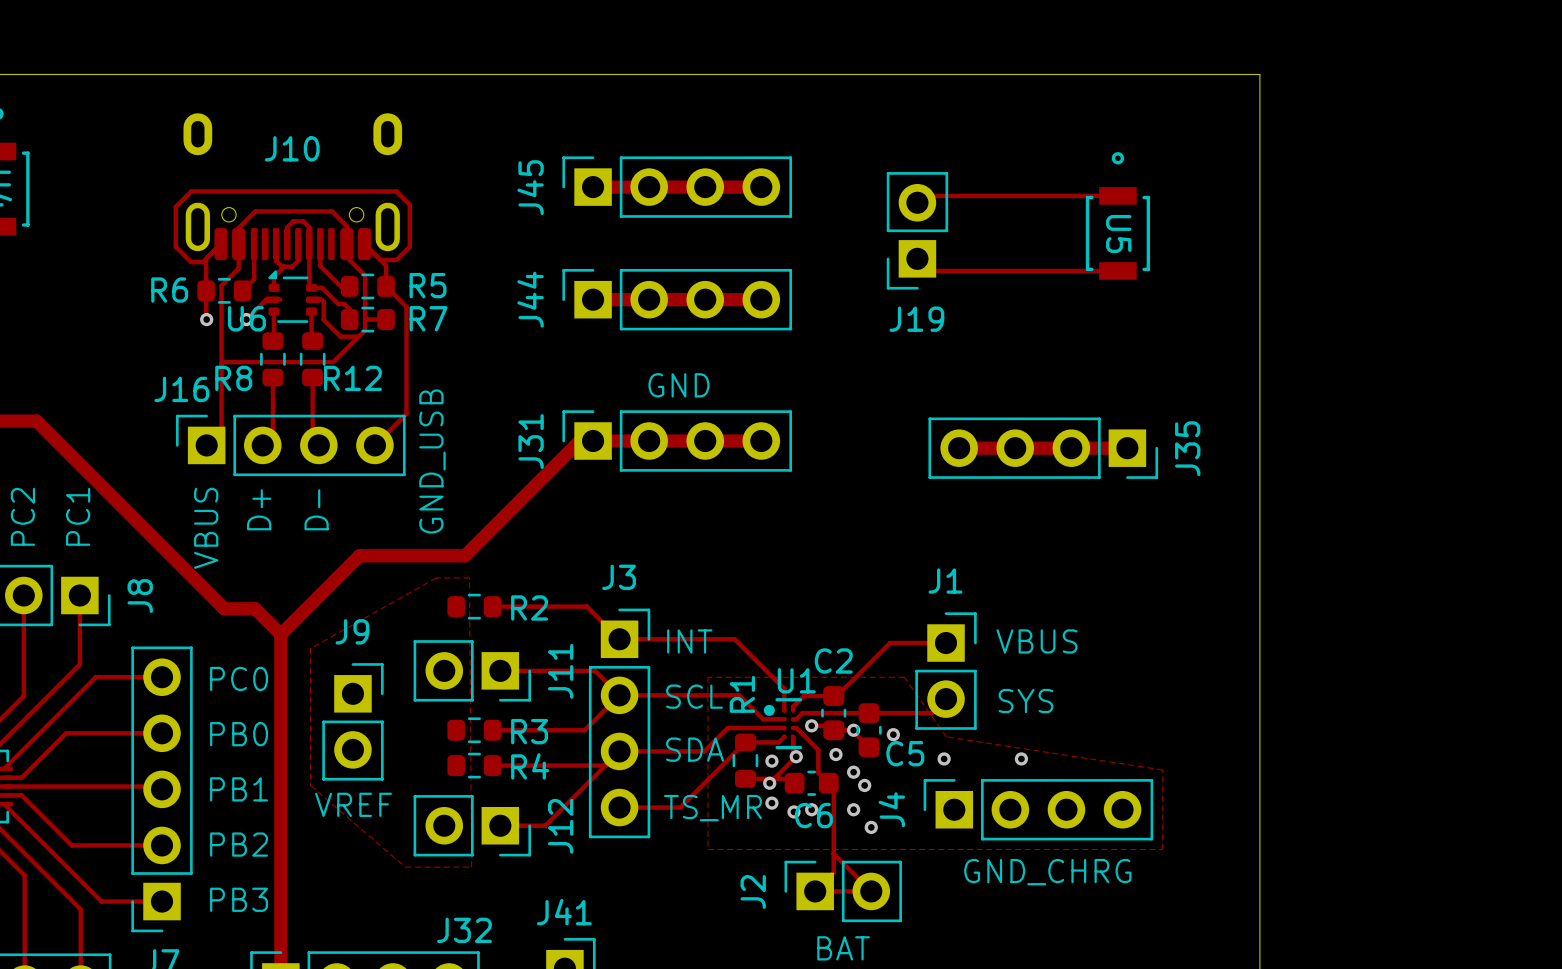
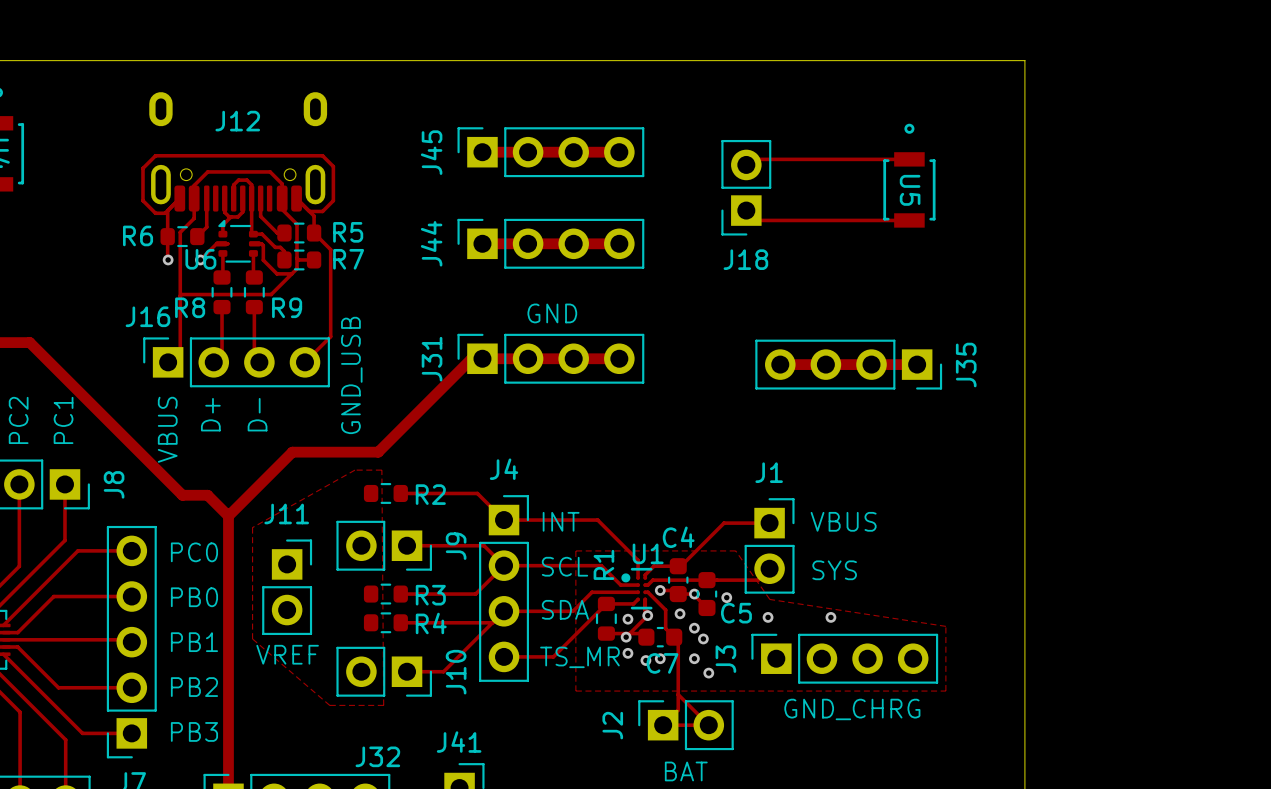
J10 name: J10 (292, 148) -> J12 (237, 121)
J19 name: J19 (916, 319) -> J18 (745, 259)
R12 name: R12 (352, 378) -> R9 (287, 307)
J3 name: J3 (619, 577) -> J4 (504, 469)
J9 name: J9 (352, 631) -> J11 (286, 513)
C2 name: C2 (833, 660) -> C4 (678, 537)
J11 name: J11 (560, 671) -> J9 (456, 546)
J4 name: J4 (891, 809) -> J3 (725, 659)
C6 name: C6 (813, 815) -> C7 (662, 663)
J12 name: J12 (560, 826) -> J10 (456, 672)

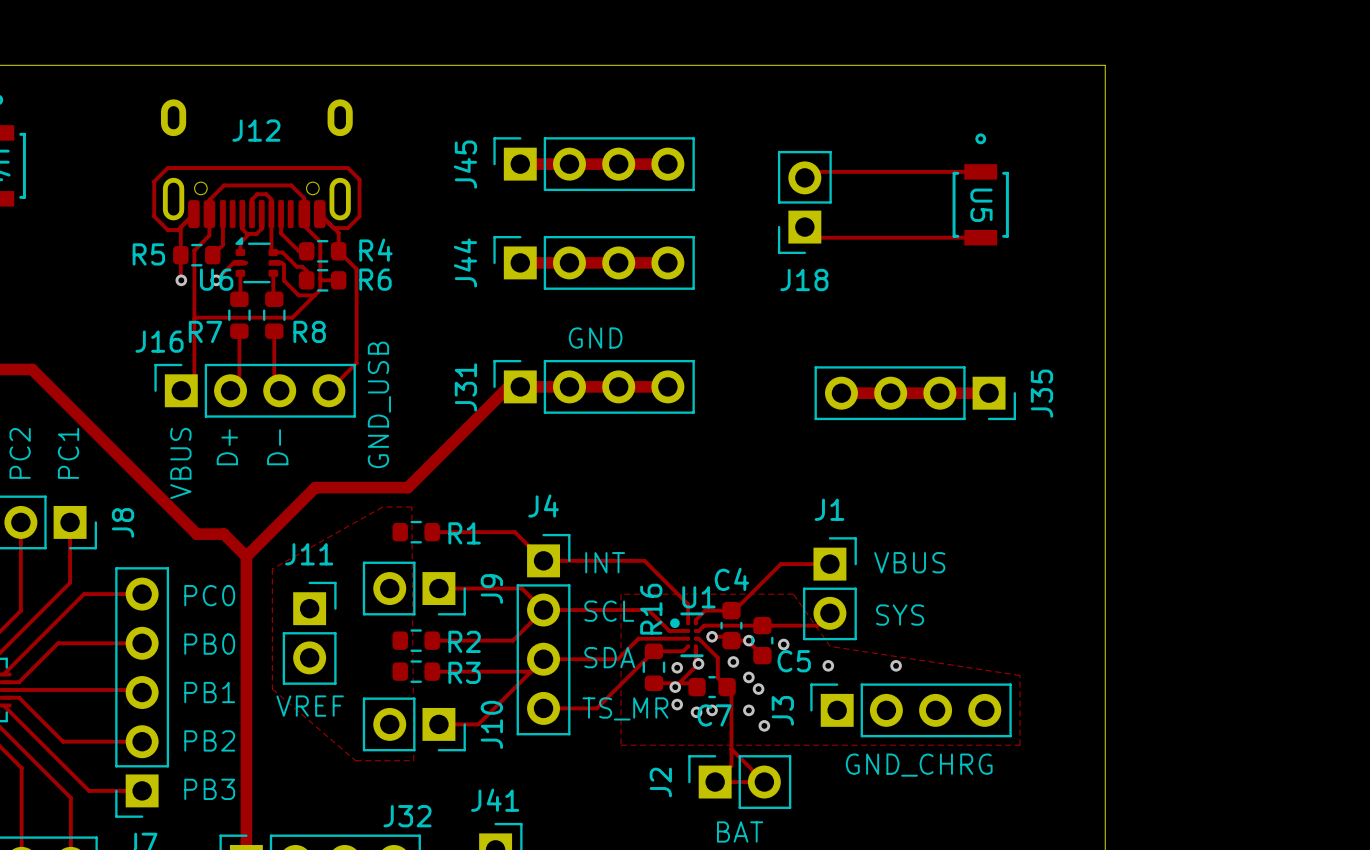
R5 name: R5 (348, 232) -> R4 (375, 250)
R6 name: R6 (138, 235) -> R5 (148, 254)
R7 name: R7 (348, 259) -> R6 (375, 279)
R8 name: R8 (190, 307) -> R7 (205, 331)
R9 name: R9 (287, 307) -> R8 (309, 331)
R2 name: R2 (430, 494) -> R1 (464, 533)
R1 name: R1 (603, 564) -> R16 (651, 609)
R3 name: R3 (430, 595) -> R2 (464, 641)
R4 name: R4 (431, 623) -> R3 (464, 672)

